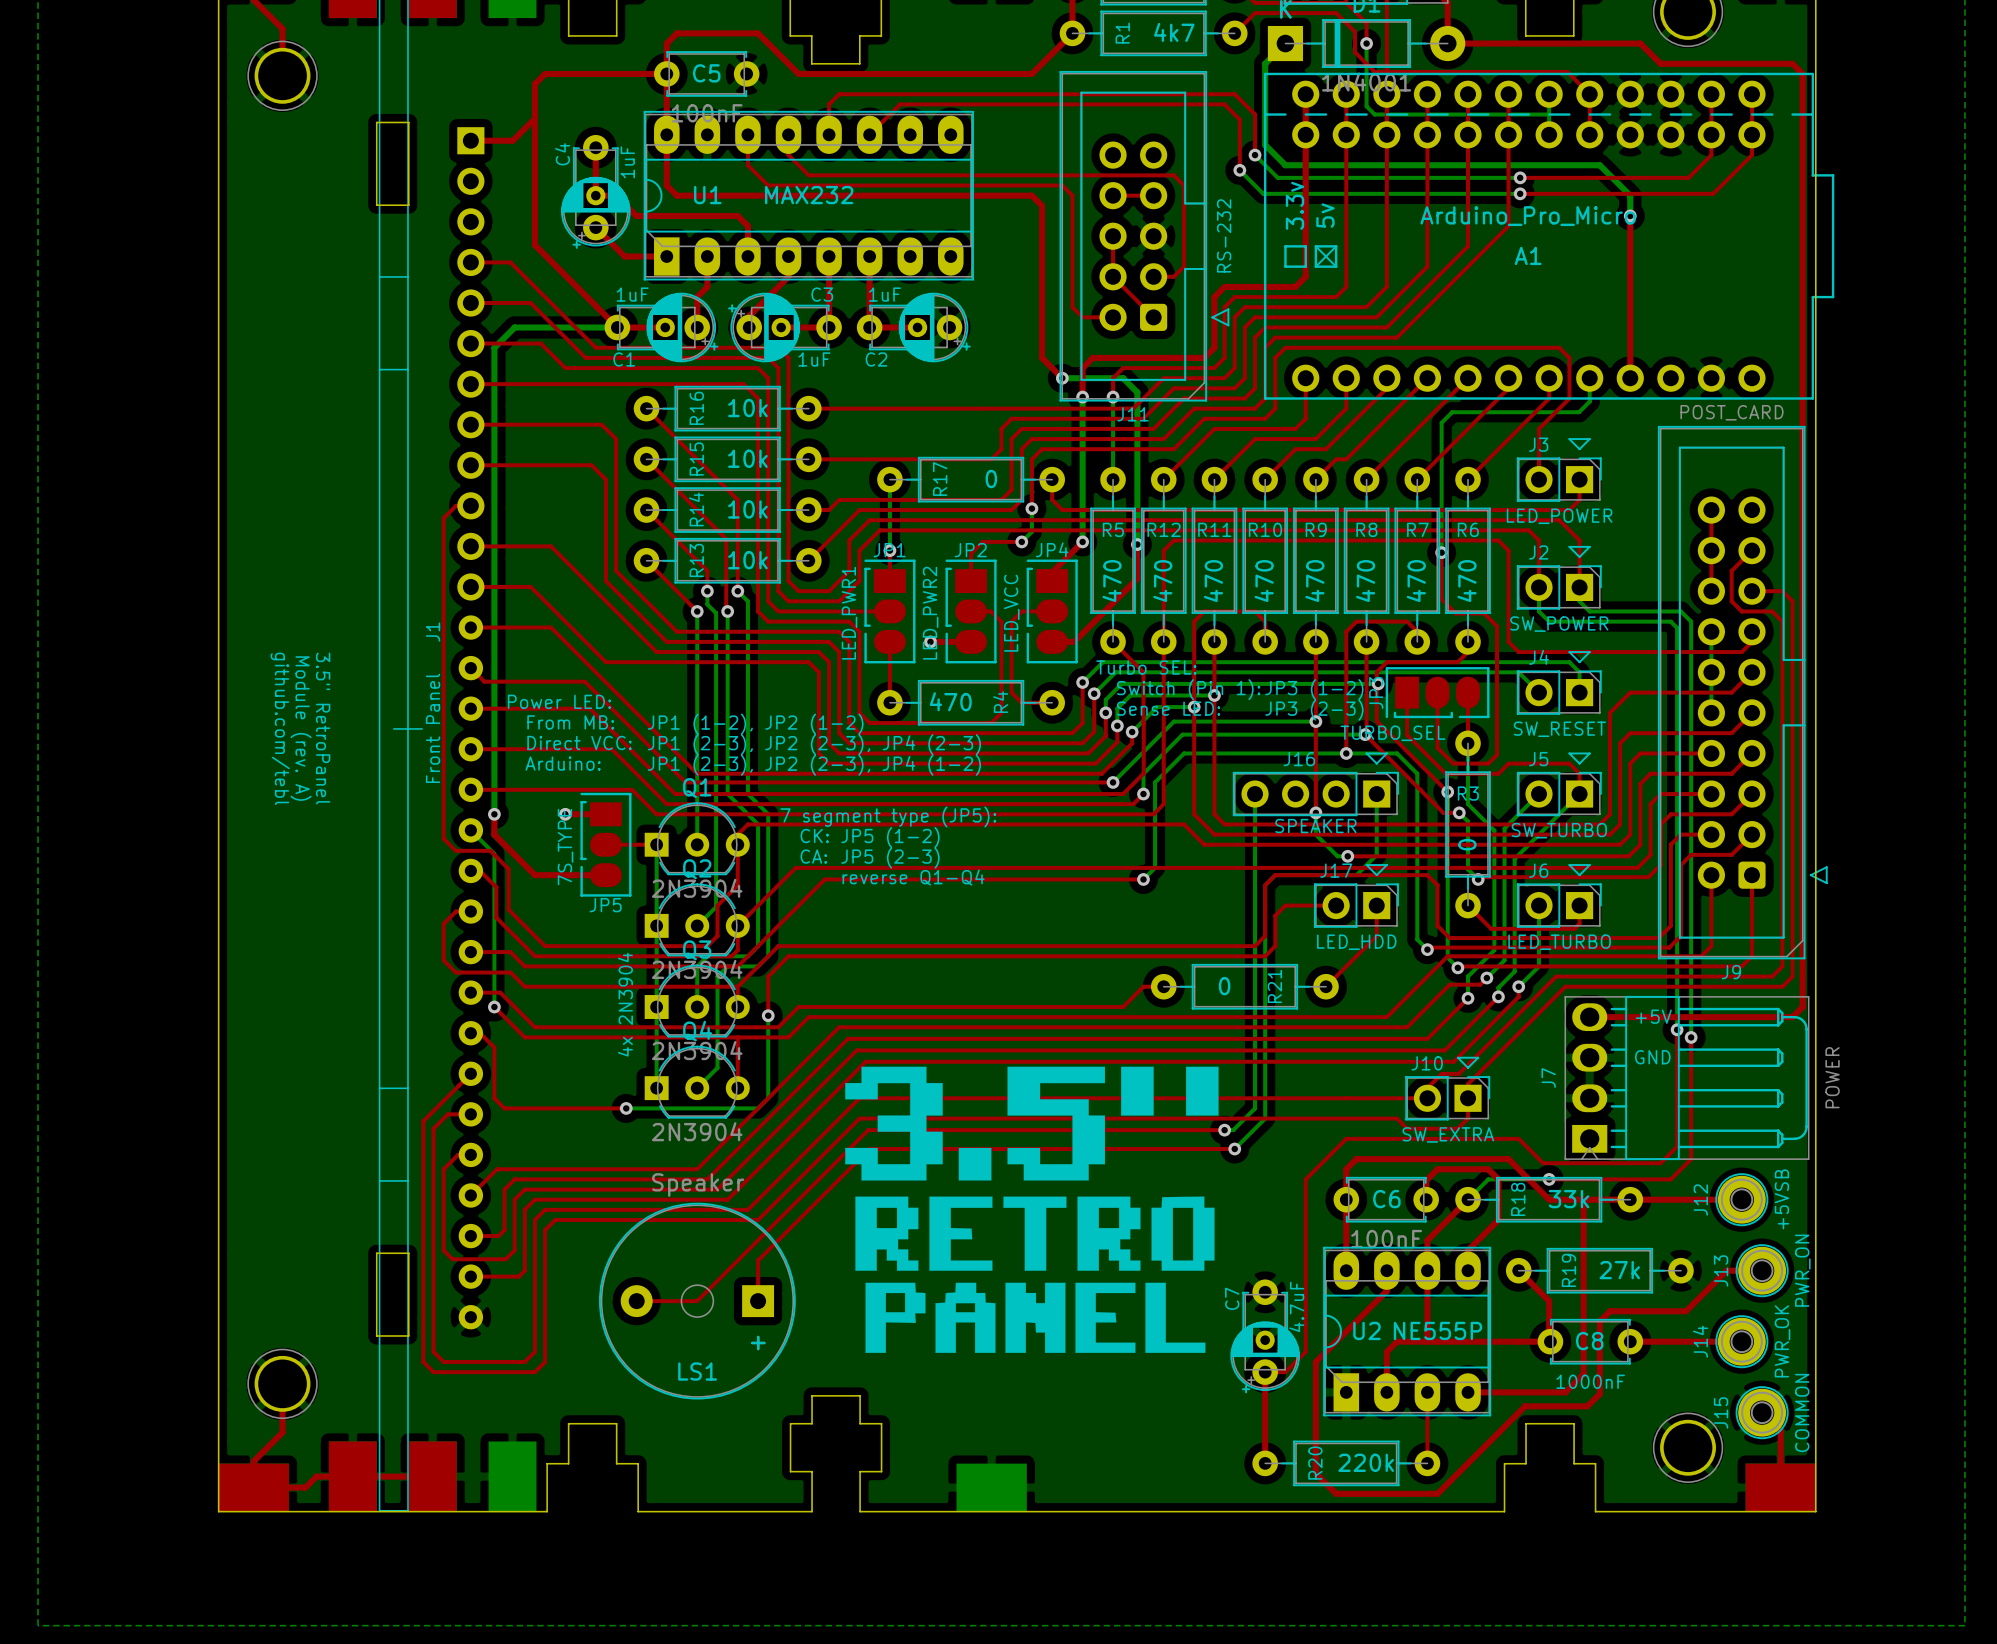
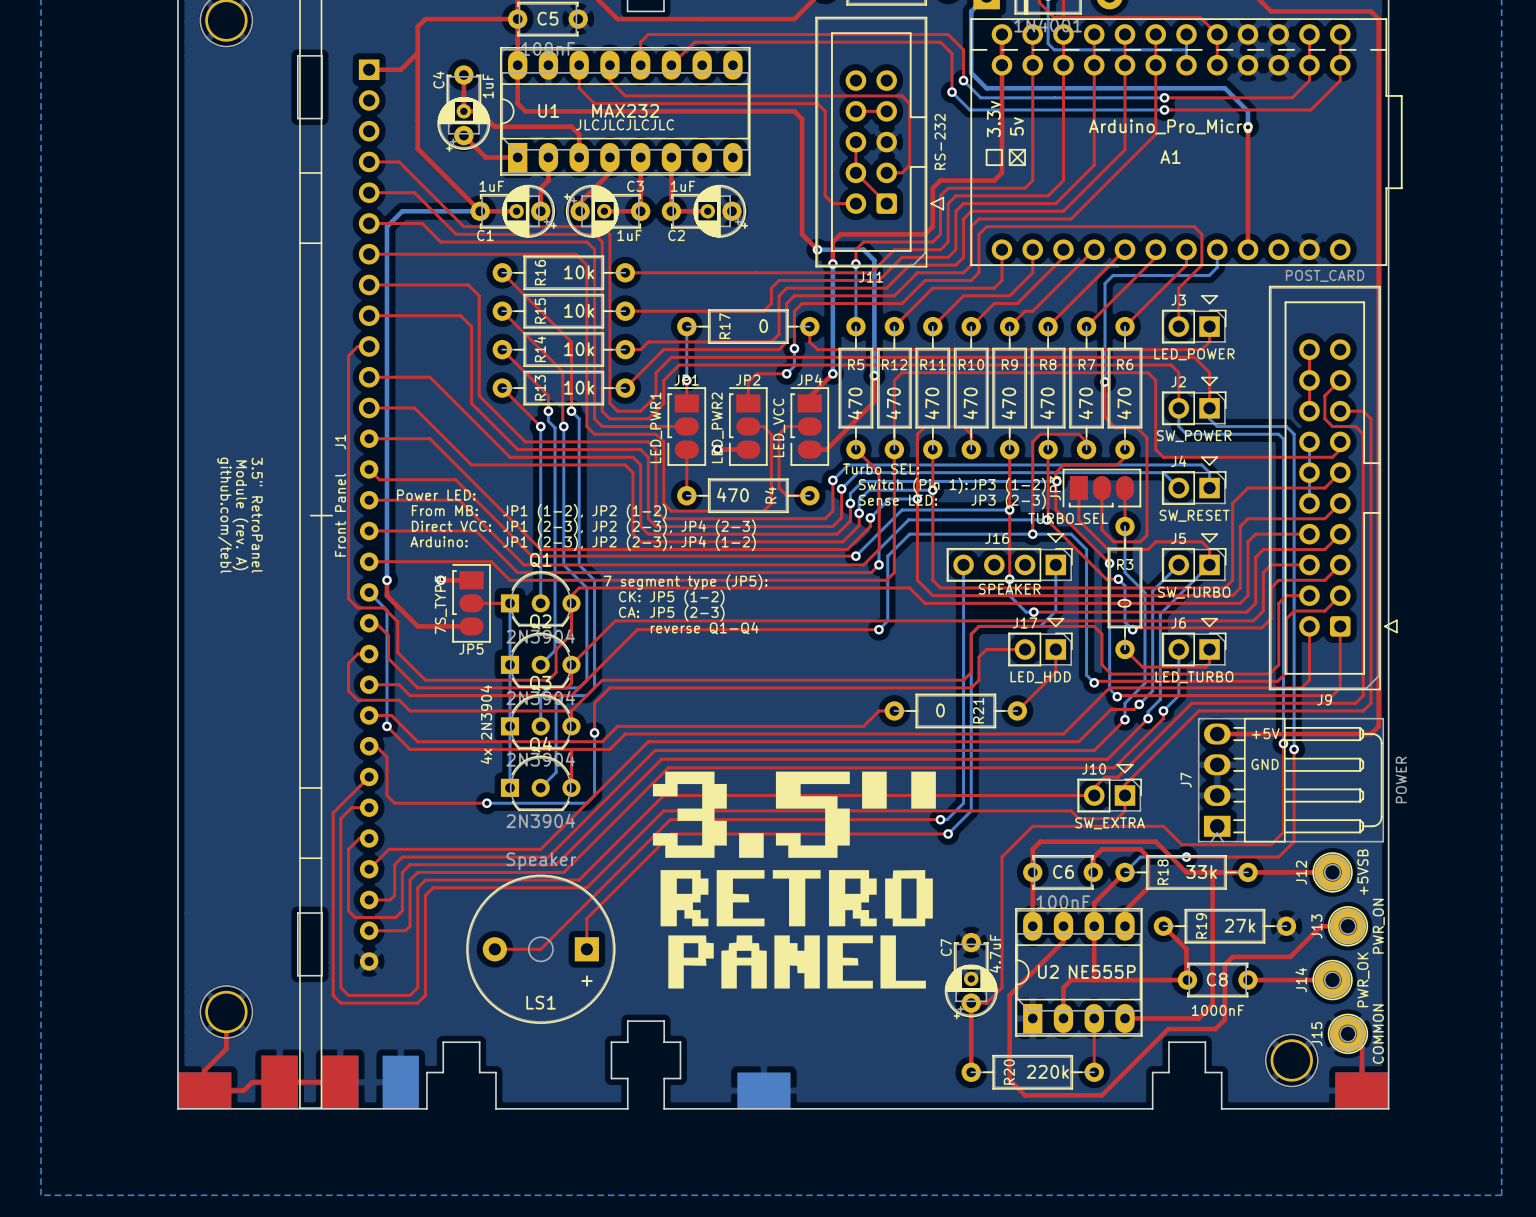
text: none -> JLCJLCJLCJLC (625, 124)

